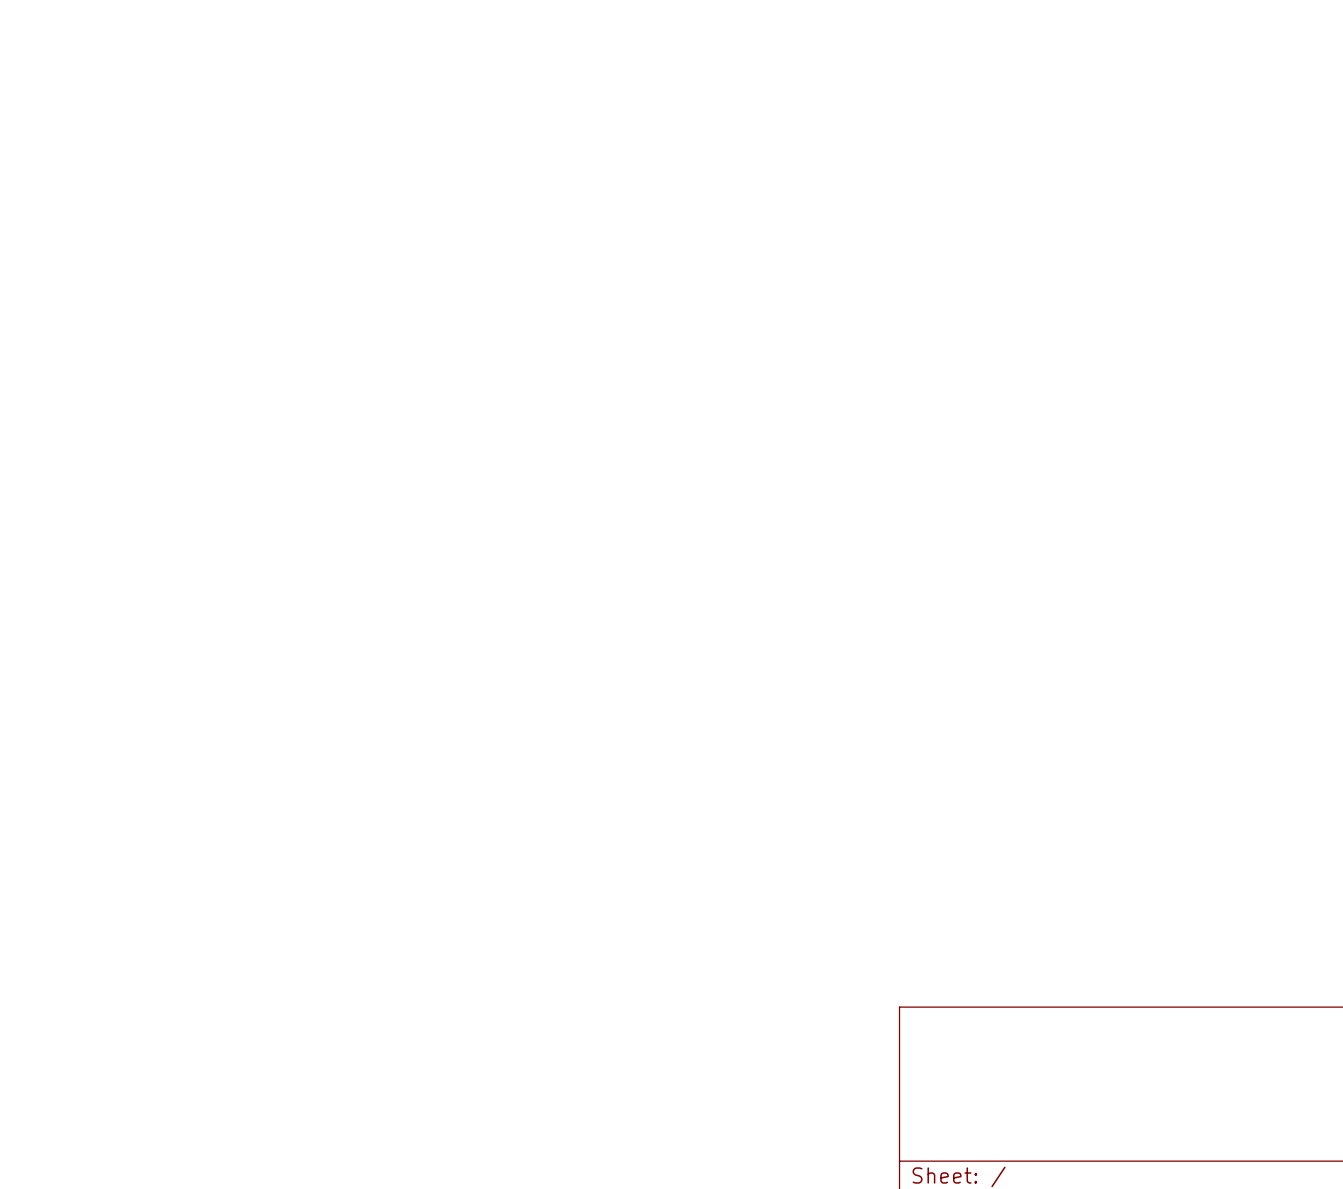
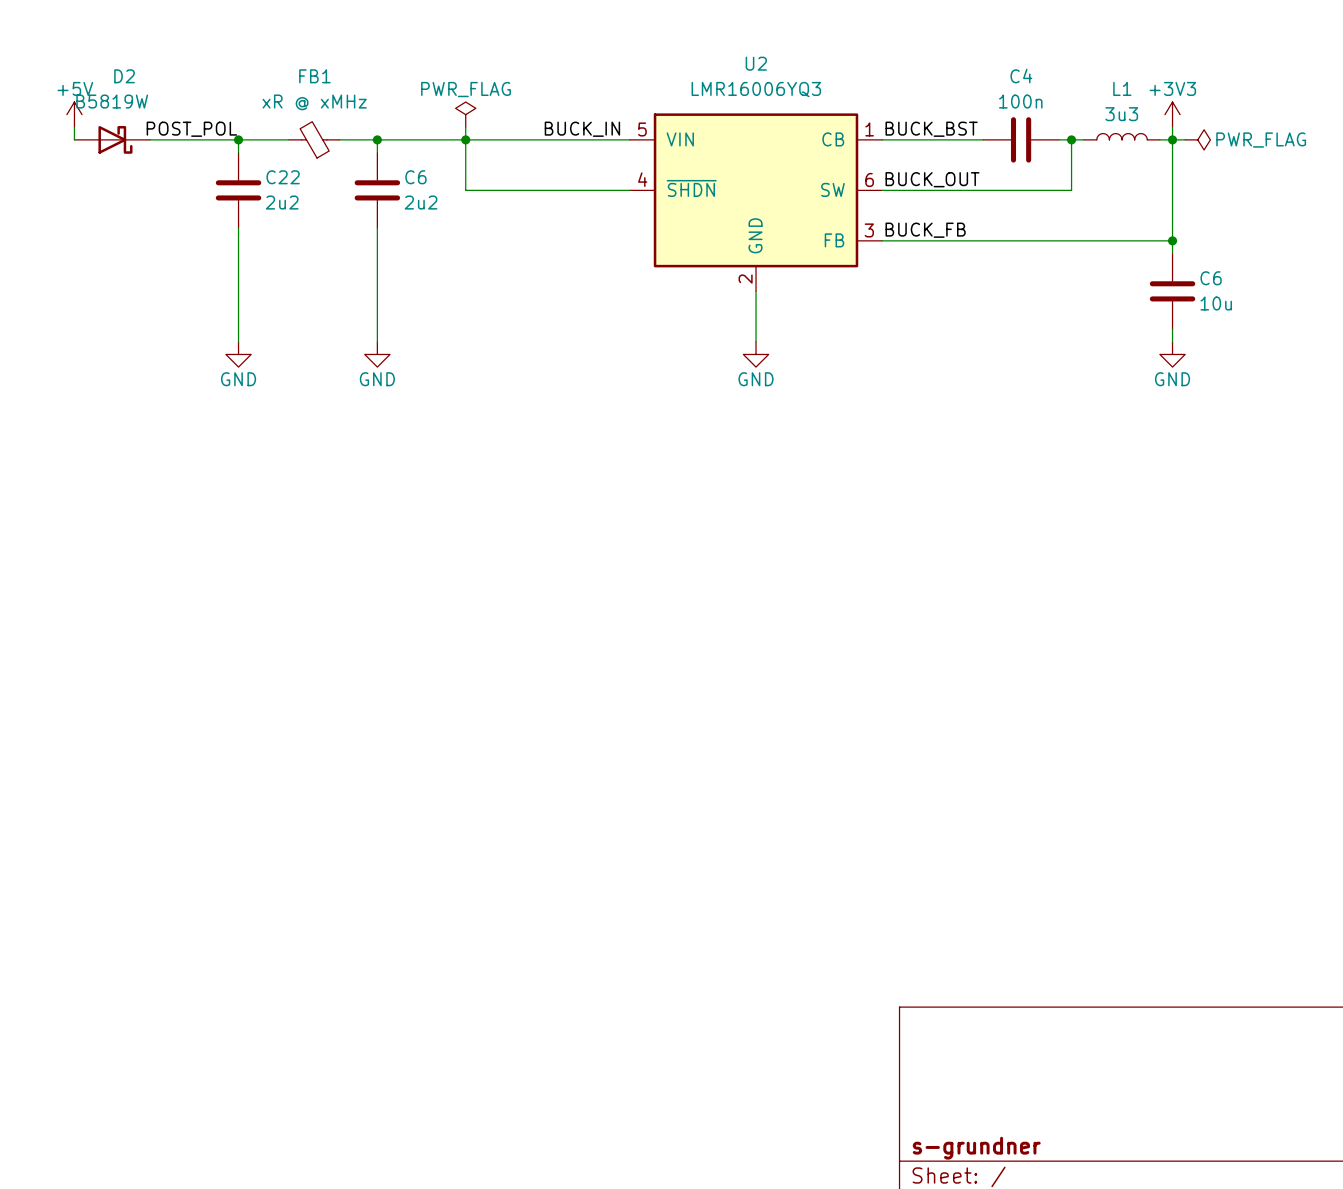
power symbol: none -> +5V (74, 114)
power symbol: none -> PWR_FLAG (465, 114)
power symbol: none -> +3V3 (1172, 114)
wire: none -> (74, 127) (74, 139)
wire: none -> (465, 127) (465, 190) (629, 190)
wire: none -> (1172, 127) (1172, 253)
label: none -> POST_POL (191, 129)
label: none -> BUCK_IN (582, 129)
label: none -> BUCK_BST (931, 129)
L1: none -> 3u3 (1122, 136)
D2: none -> B5819W (112, 139)
wire: none -> (150, 139) (289, 139)
wire: none -> (238, 139) (238, 152)
junction: none -> (238, 139)
FB1: none -> xR @ xMHz (314, 139)
wire: none -> (339, 139) (629, 139)
wire: none -> (377, 139) (377, 152)
junction: none -> (377, 139)
junction: none -> (465, 139)
wire: none -> (882, 139) (983, 139)
C4: none -> 100n (1021, 139)
wire: none -> (1058, 139) (1084, 139)
wire: none -> (1071, 139) (1071, 190) (882, 190)
junction: none -> (1071, 139)
wire: none -> (1159, 139) (1185, 139)
junction: none -> (1172, 139)
power symbol: none -> PWR_FLAG (1197, 139)
label: none -> BUCK_OUT (932, 179)
C22: none -> 2u2 (238, 190)
C6: none -> 2u2 (377, 190)
U2: none -> LMR16006YQ3 (756, 202)
wire: none -> (238, 228) (238, 341)
wire: none -> (377, 228) (377, 341)
label: none -> BUCK_FB (925, 230)
wire: none -> (882, 240) (1172, 240)
junction: none -> (1172, 240)
wire: none -> (756, 291) (756, 341)
C6: none -> 10u (1172, 291)
wire: none -> (1172, 329) (1172, 341)
power symbol: none -> GND (238, 354)
power symbol: none -> GND (377, 354)
power symbol: none -> GND (756, 354)
power symbol: none -> GND (1172, 354)
title block: none -> s-grundner (976, 1148)

